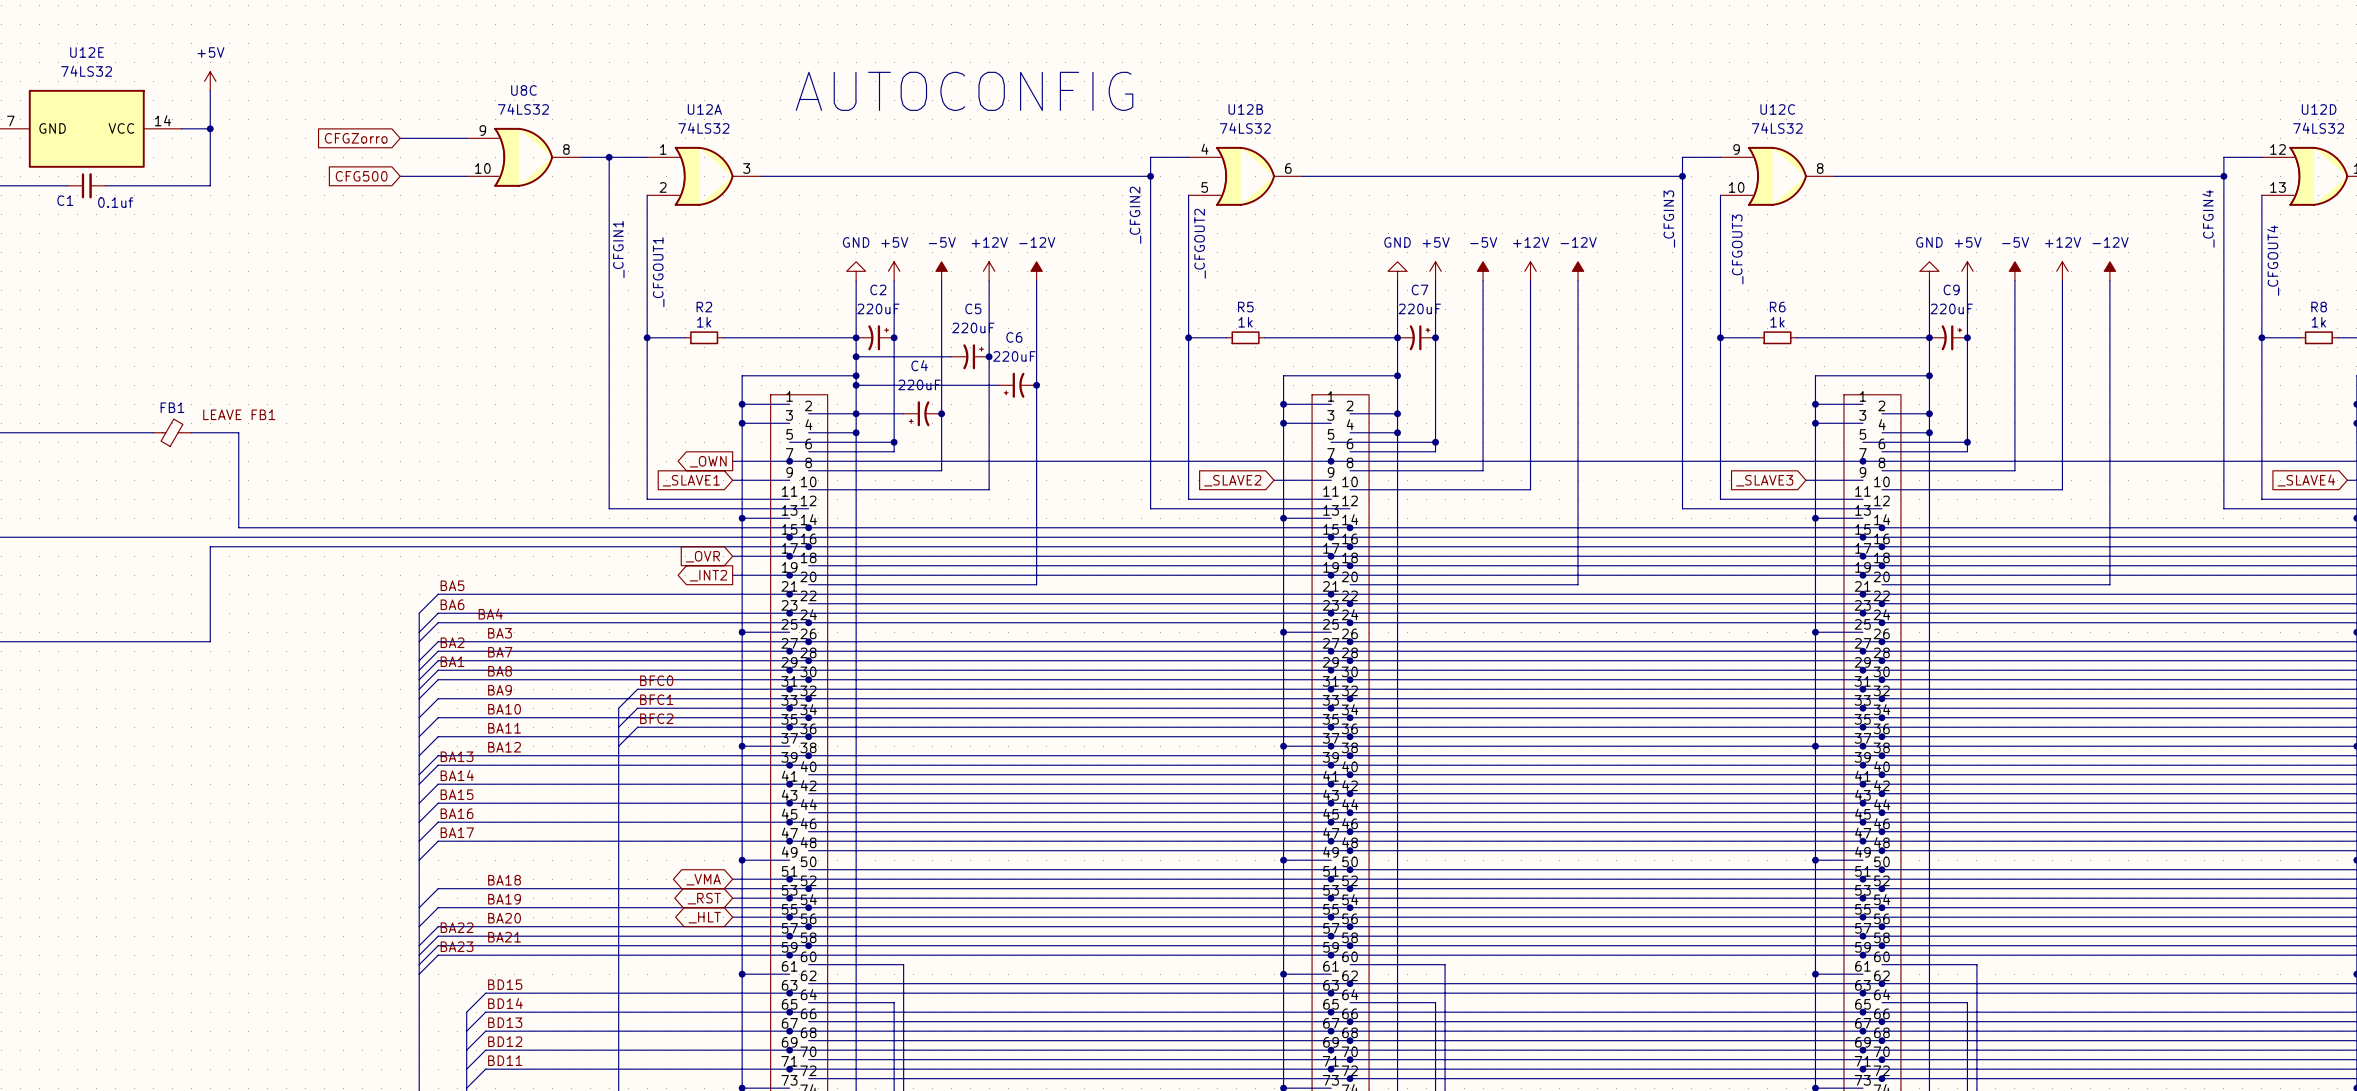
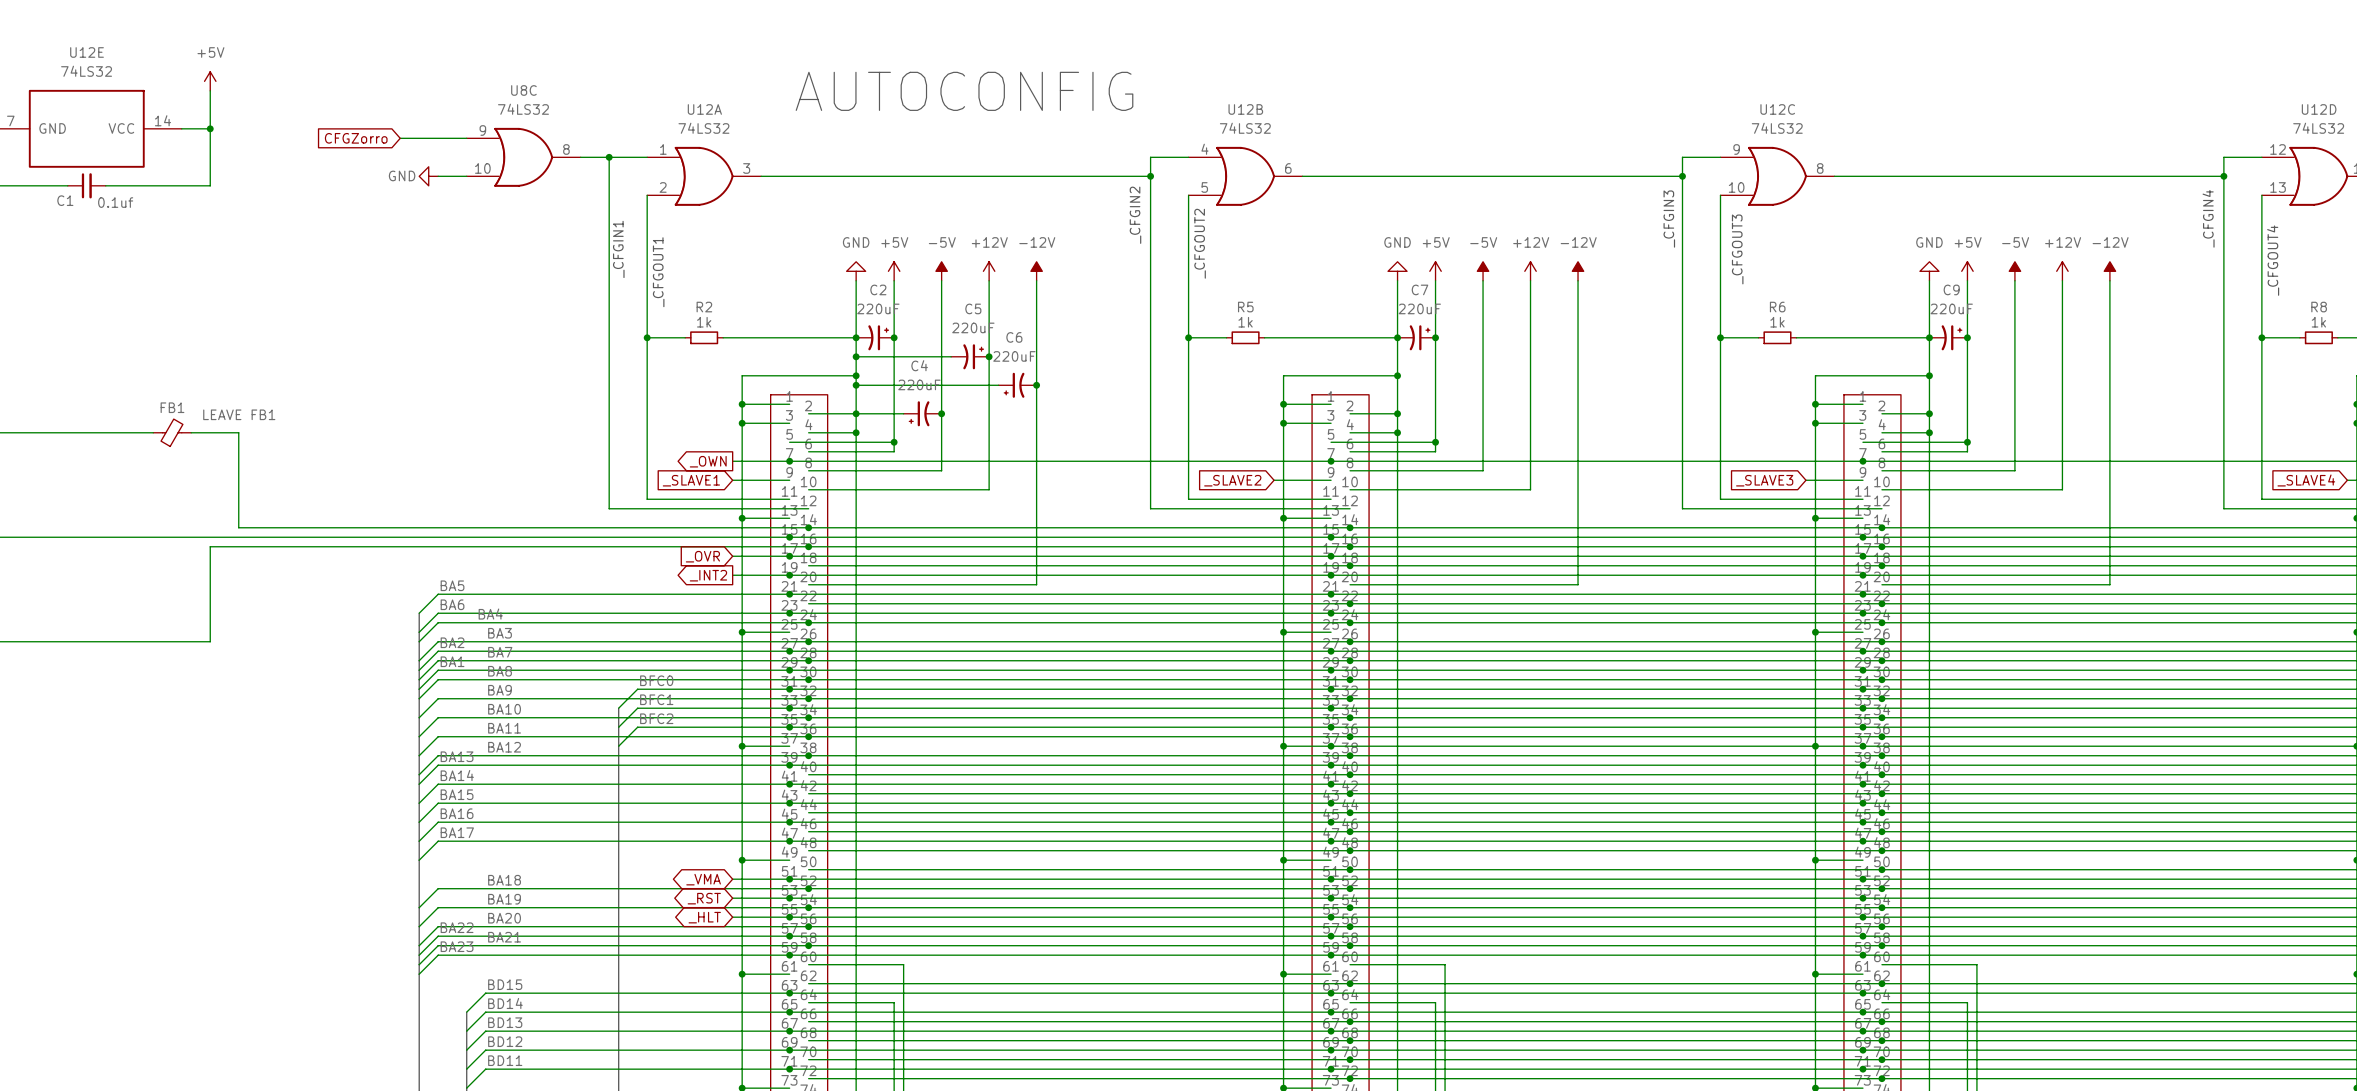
global label: CFG500 (361, 176) -> none
wire: (400, 176) (438, 176) -> none
power symbol: none -> GND (428, 176)

